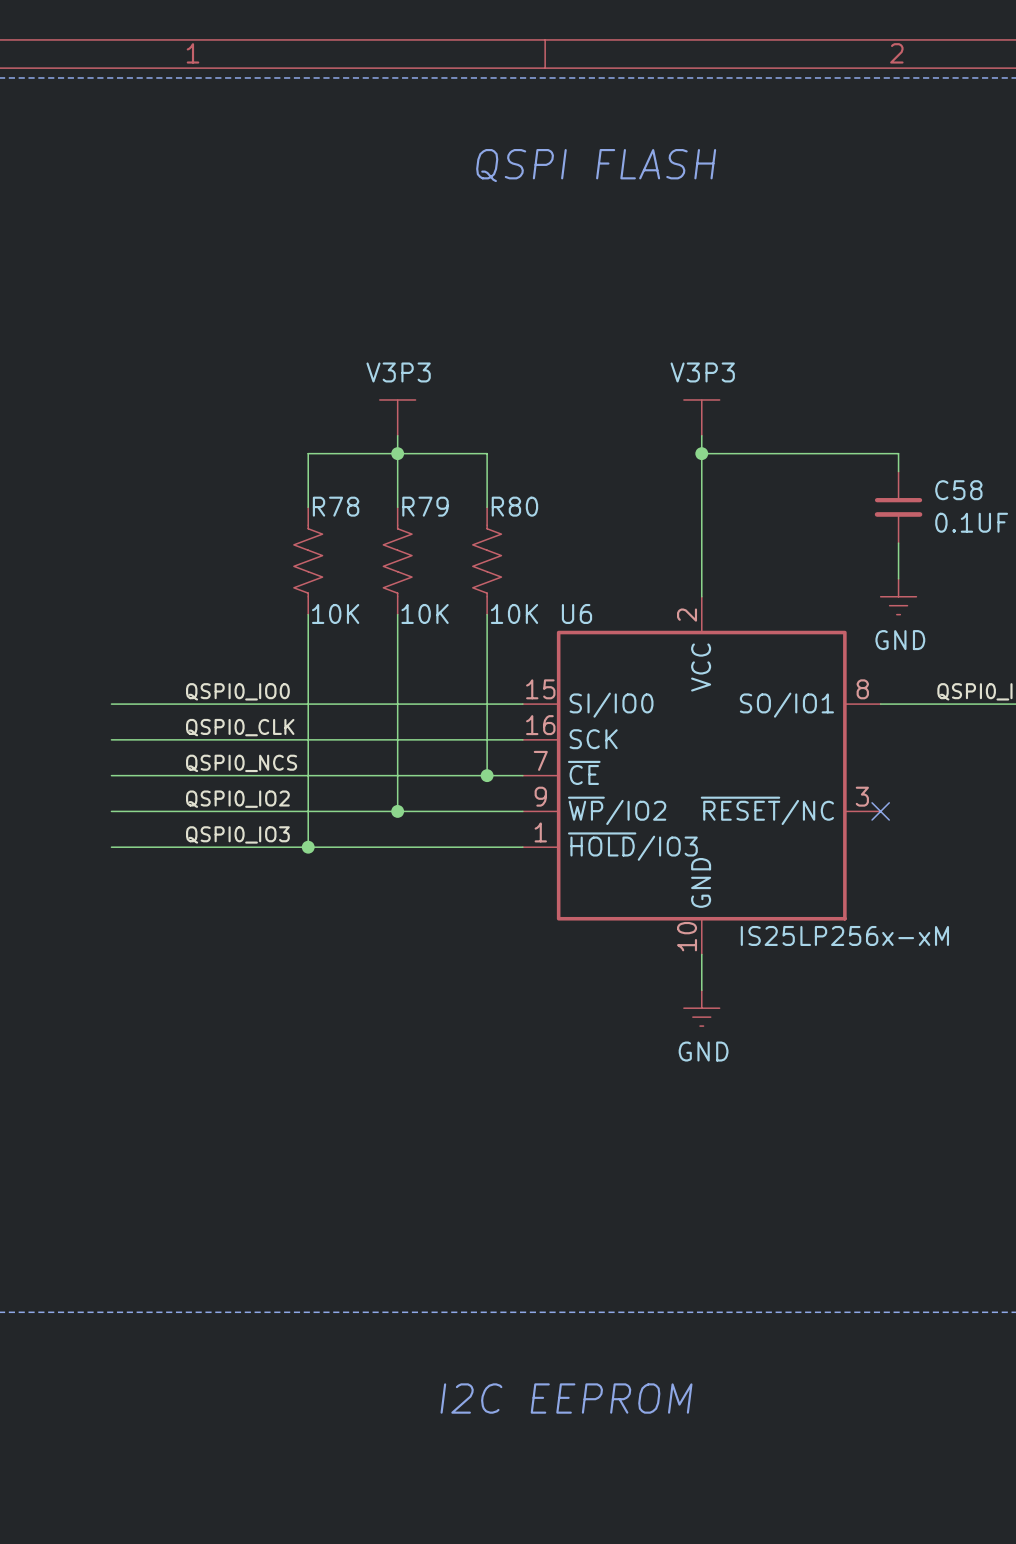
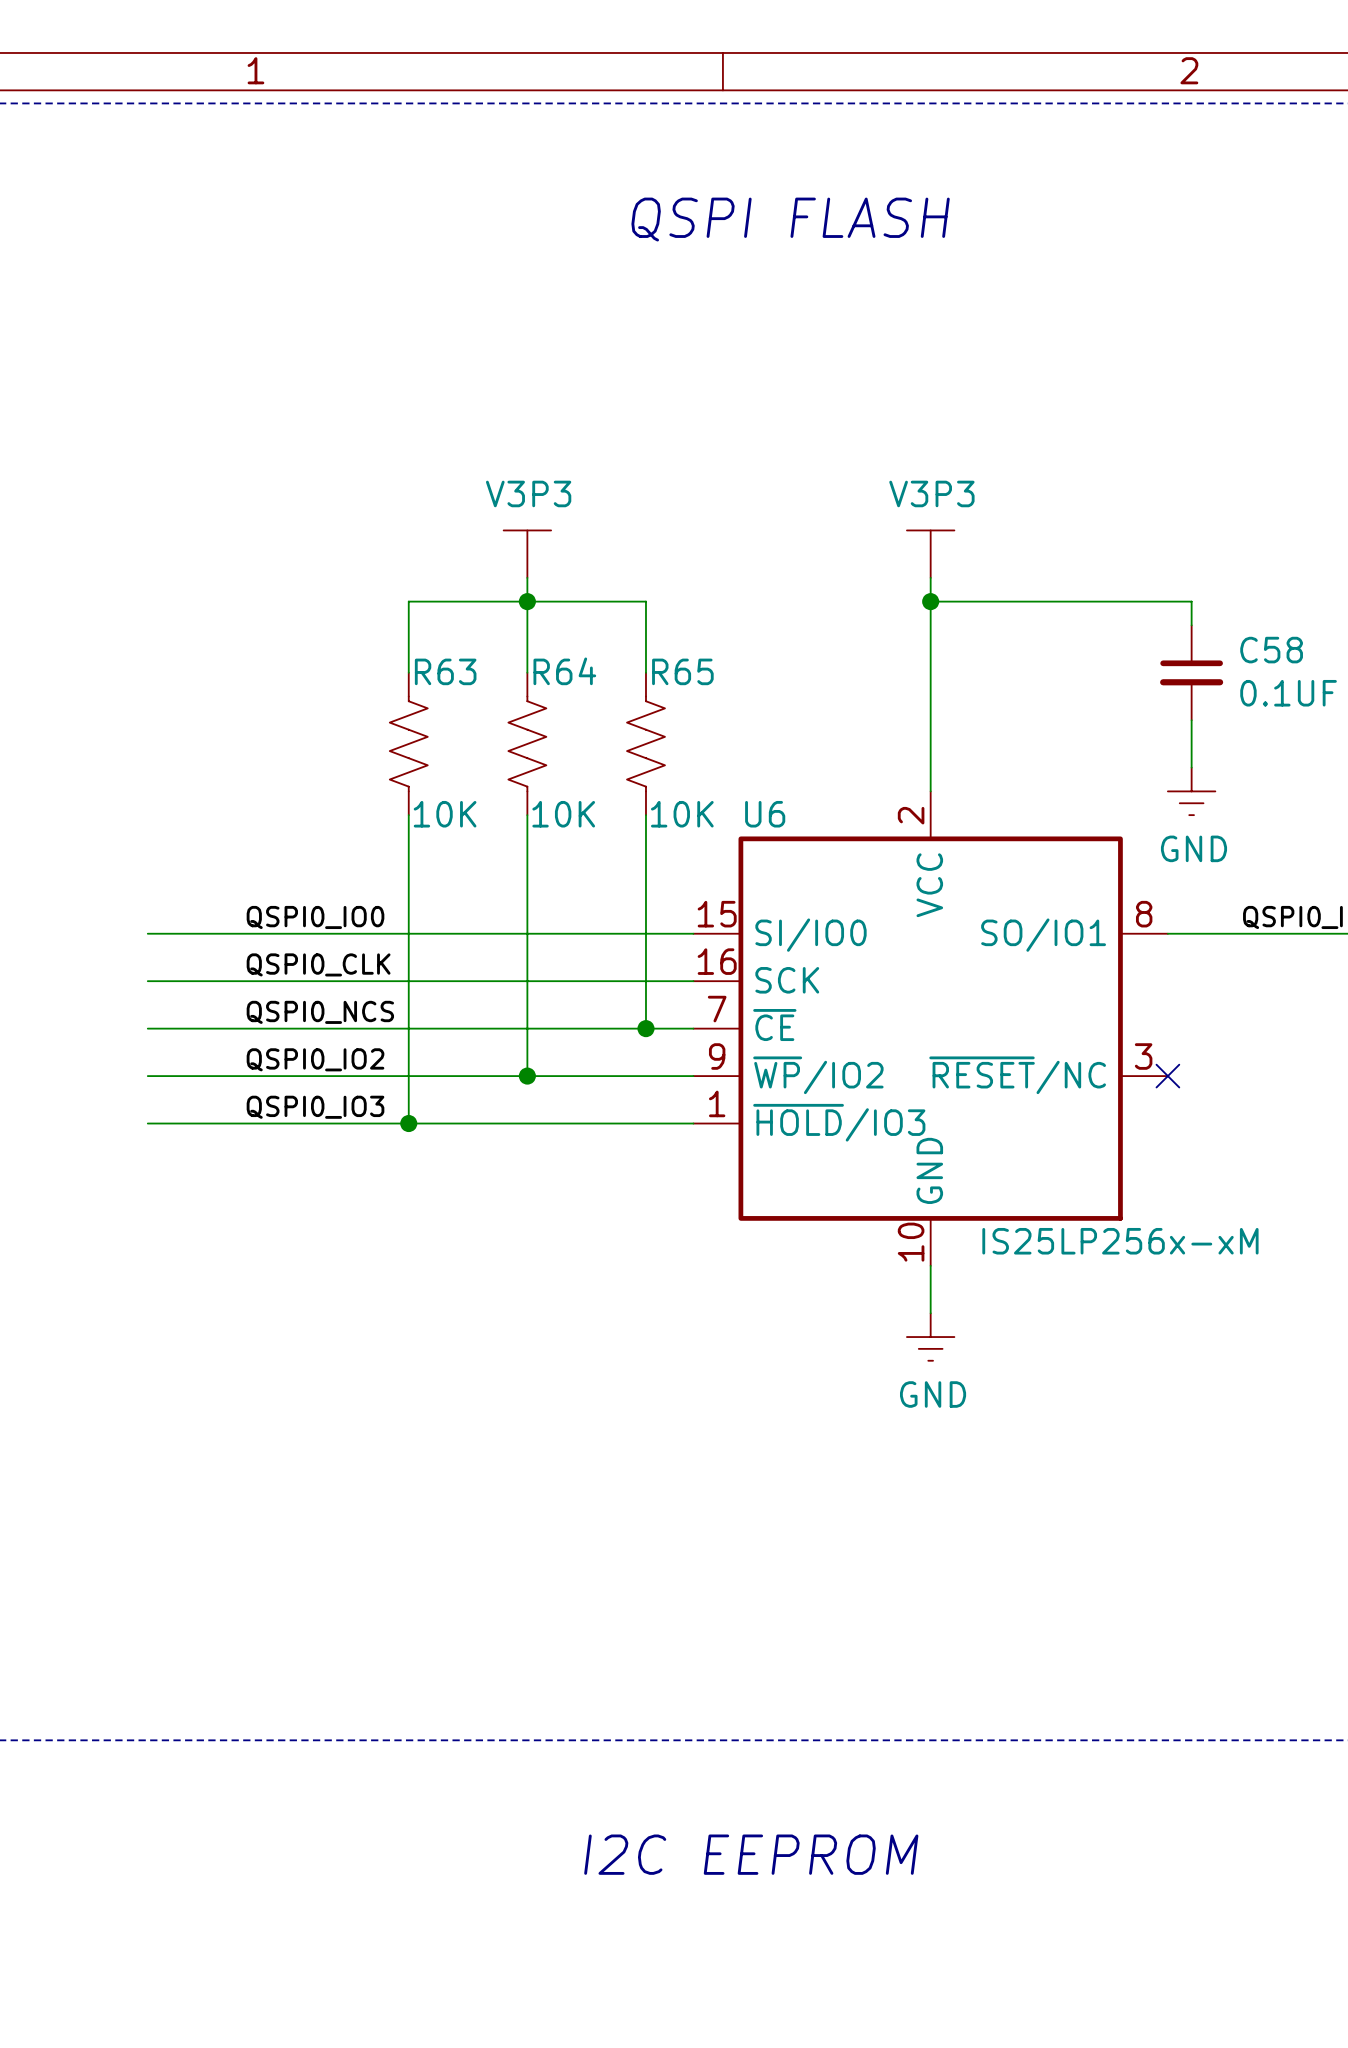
R78 name: R78 (336, 506) -> R63 (445, 671)
R79 name: R79 (425, 506) -> R64 (564, 671)
R80 name: R80 (514, 506) -> R65 (682, 671)

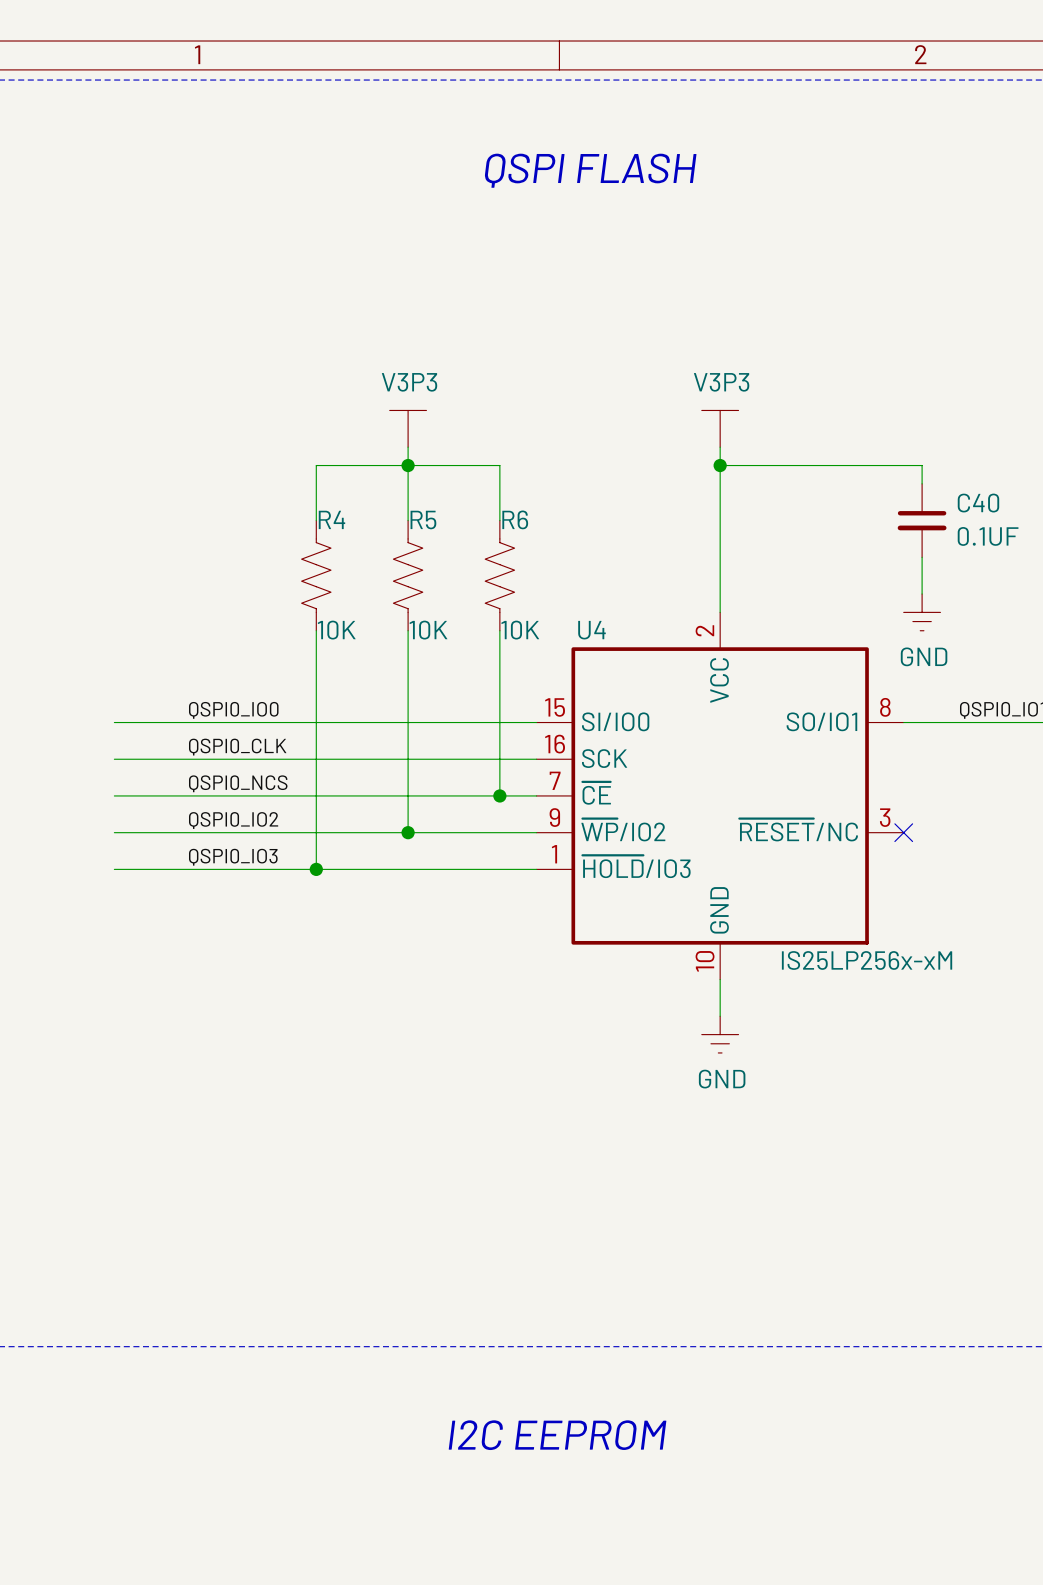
C58 name: C58 (1271, 650) -> C40 (978, 503)
R63 name: R63 (445, 671) -> R4 (331, 519)
R64 name: R64 (564, 671) -> R5 (423, 520)
R65 name: R65 (682, 671) -> R6 (515, 519)
U6 name: U6 (765, 814) -> U4 (591, 630)

